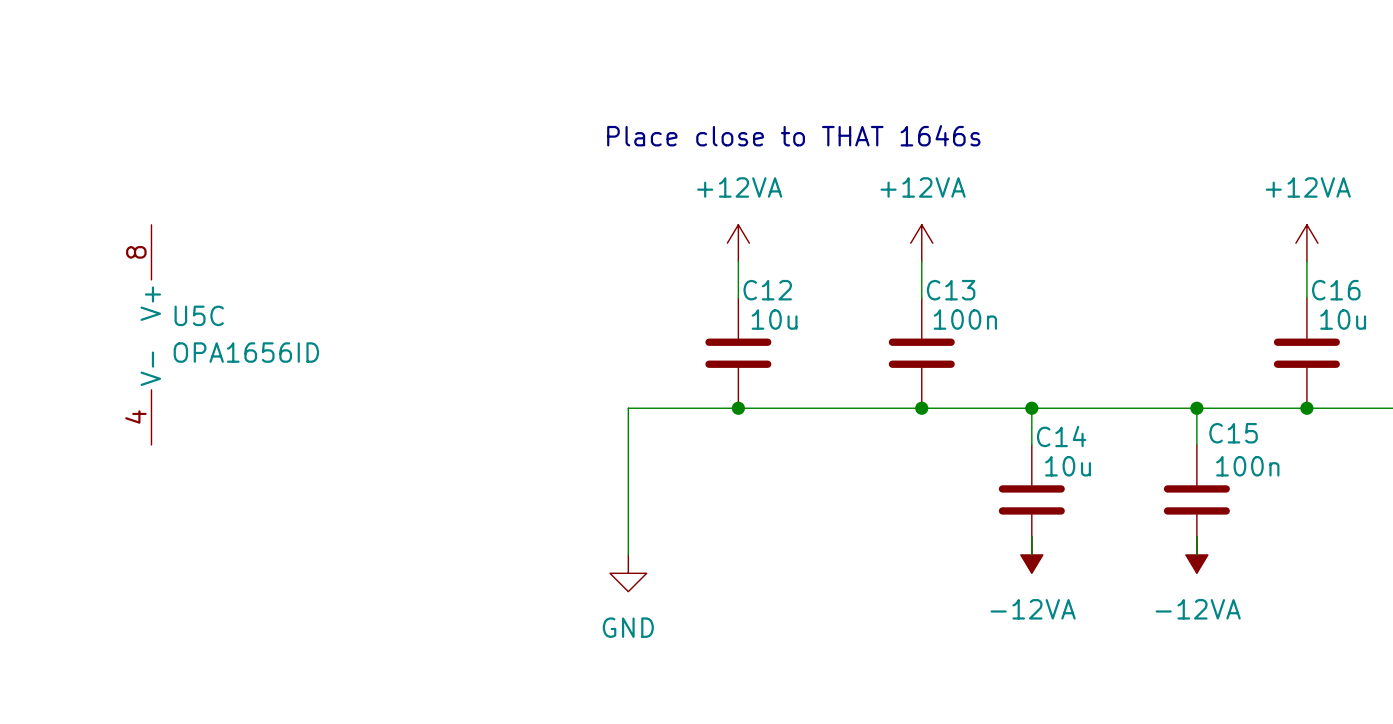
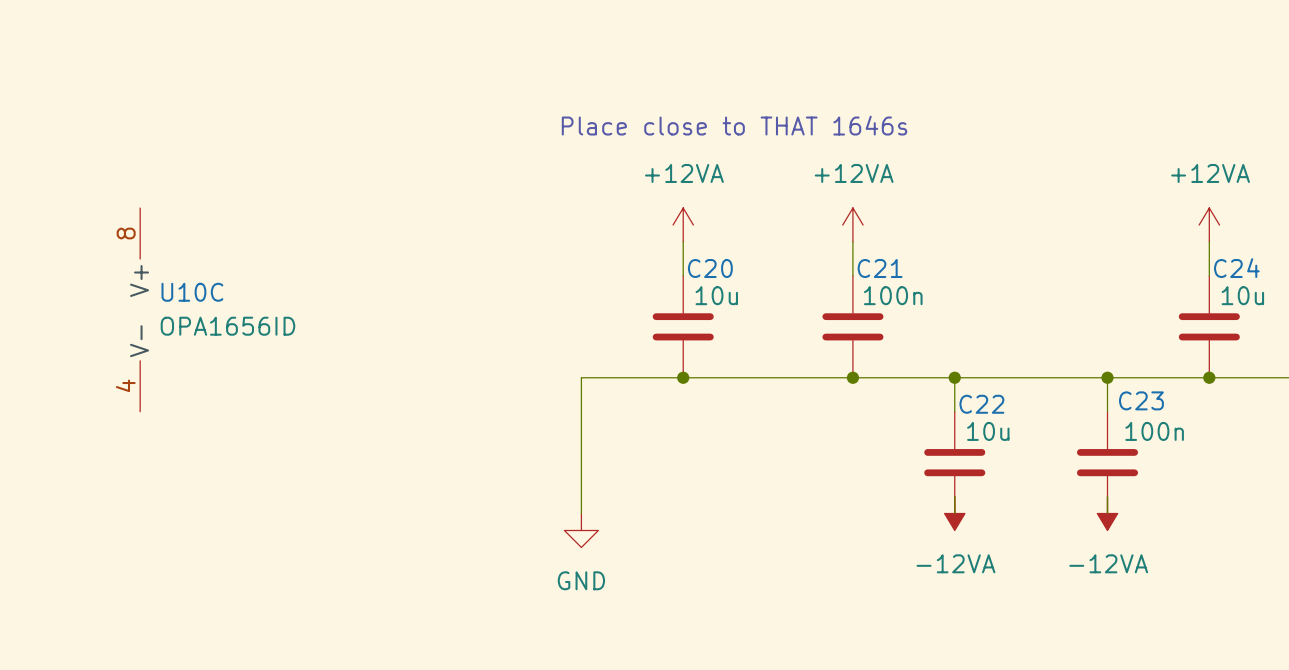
C12 name: C12 (767, 290) -> C20 (710, 268)
C13 name: C13 (951, 290) -> C21 (880, 268)
C16 name: C16 (1336, 290) -> C24 (1236, 268)
U5C name: U5C (199, 315) -> U10C (192, 292)
C15 name: C15 (1233, 433) -> C23 (1141, 400)
C14 name: C14 (1061, 436) -> C22 (981, 404)

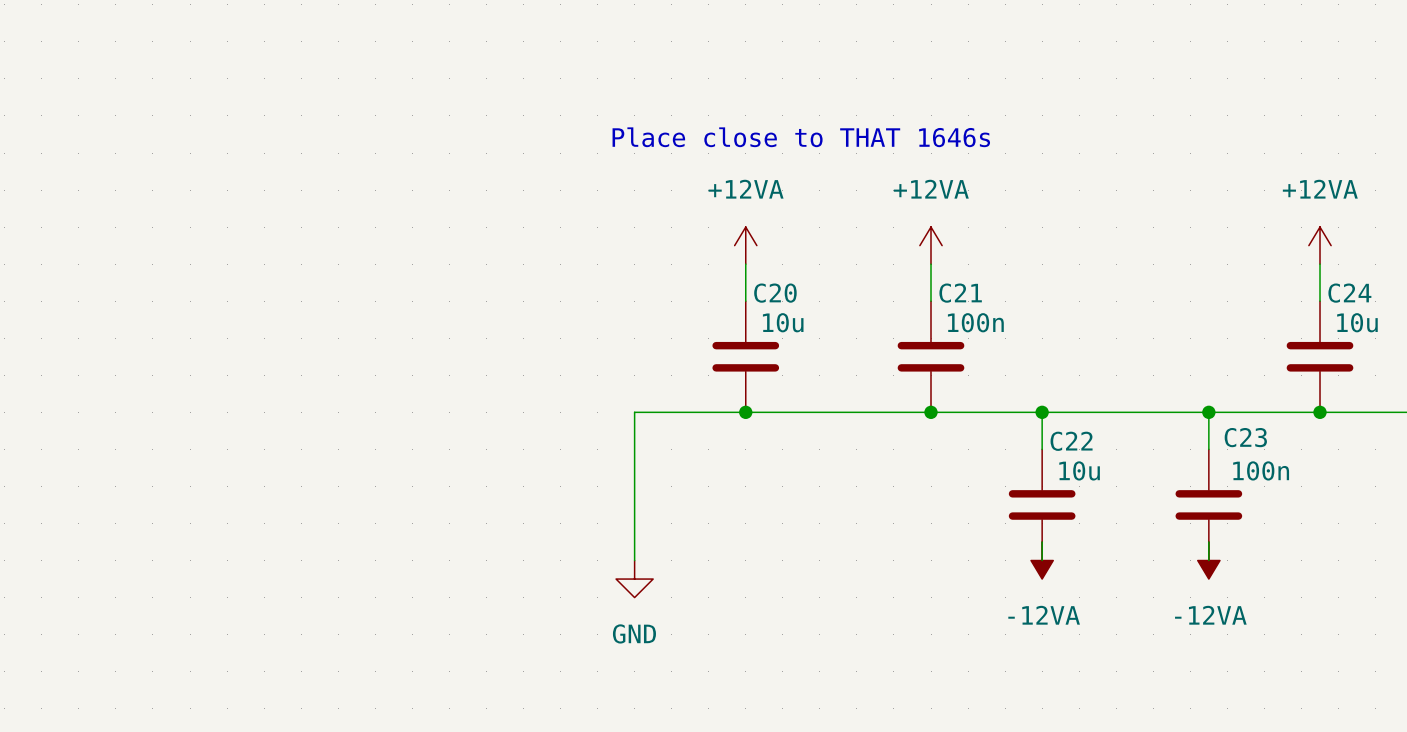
U10C: OPA1656ID (140, 309) -> none

